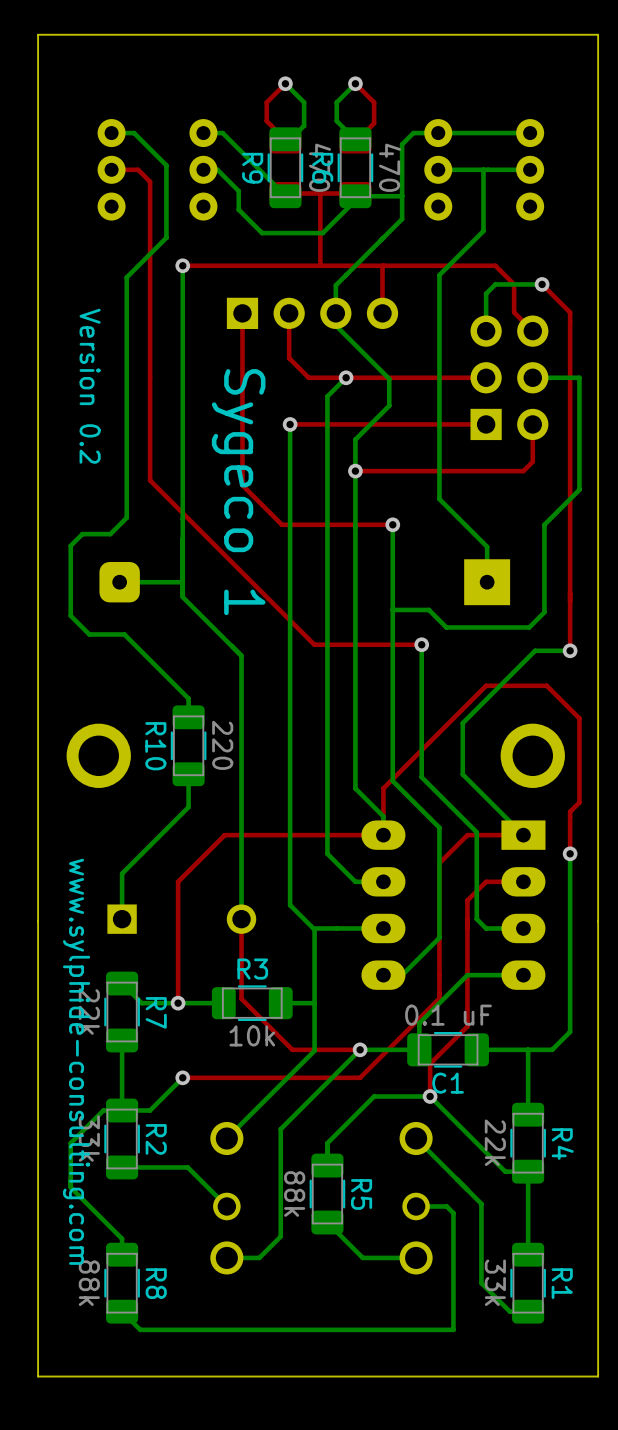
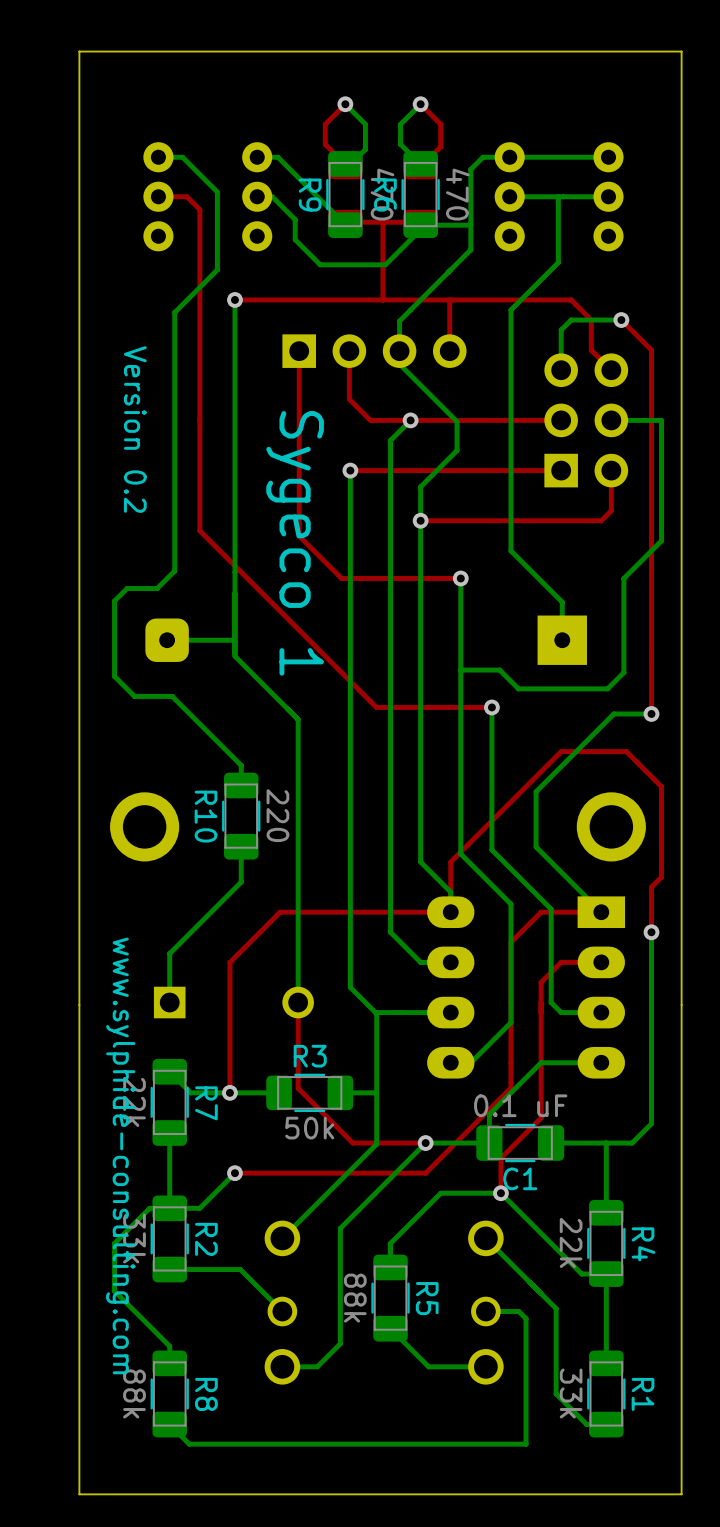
R3 value: 10k (252, 1035) -> 50k (309, 1128)

